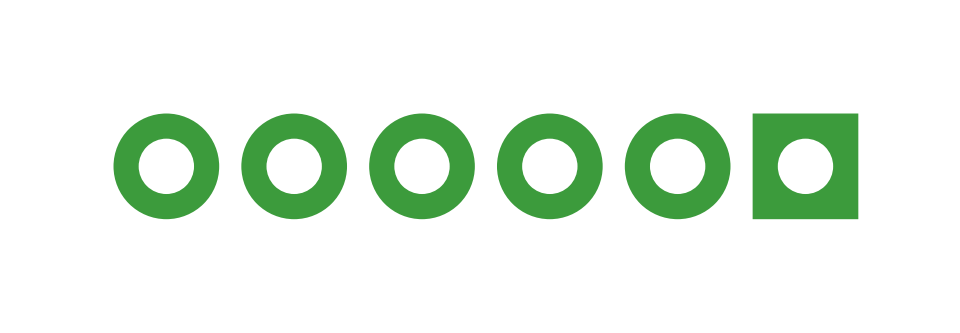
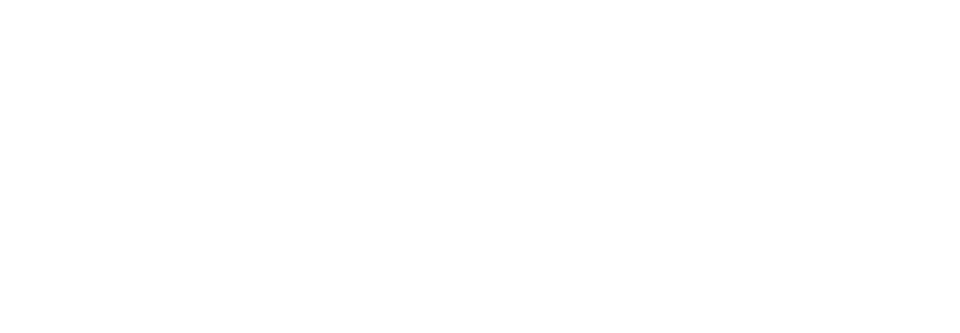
part: (485, 166) -> none

